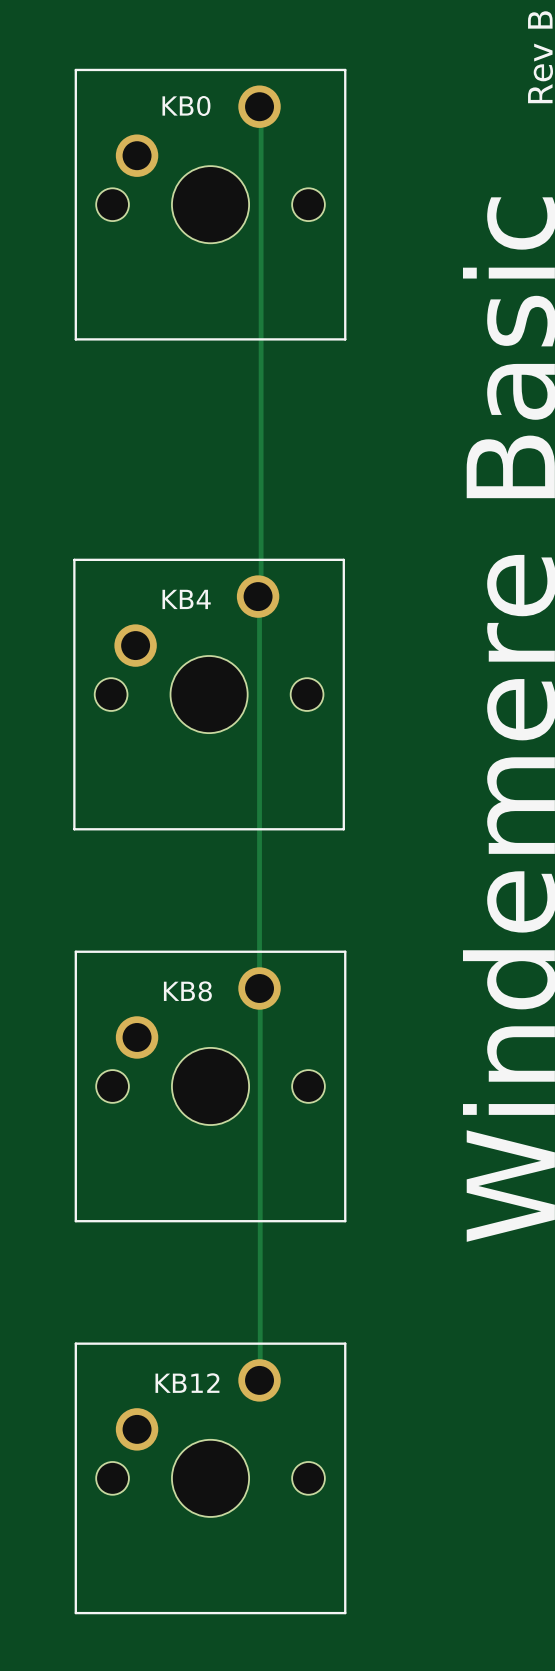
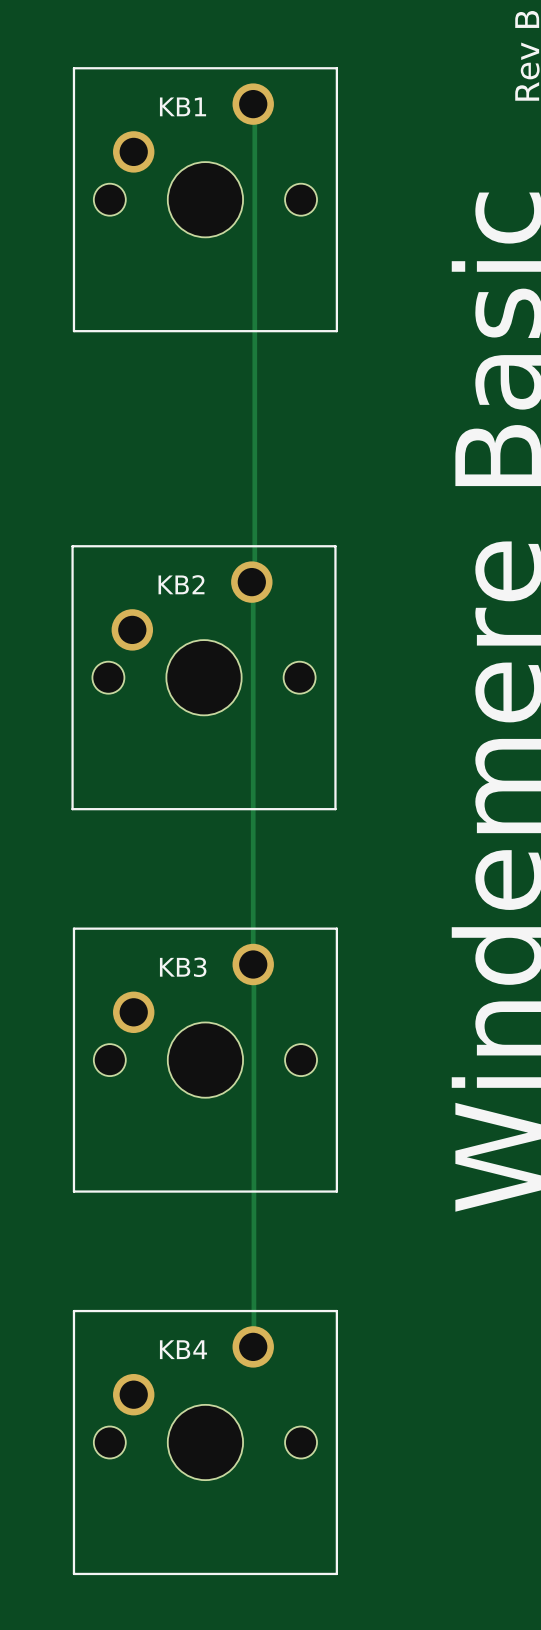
KB0 name: KB0 (186, 105) -> KB1 (183, 106)
KB4 name: KB4 (186, 599) -> KB2 (181, 584)
KB8 name: KB8 (187, 991) -> KB3 (183, 967)
KB12 name: KB12 (187, 1383) -> KB4 (183, 1349)

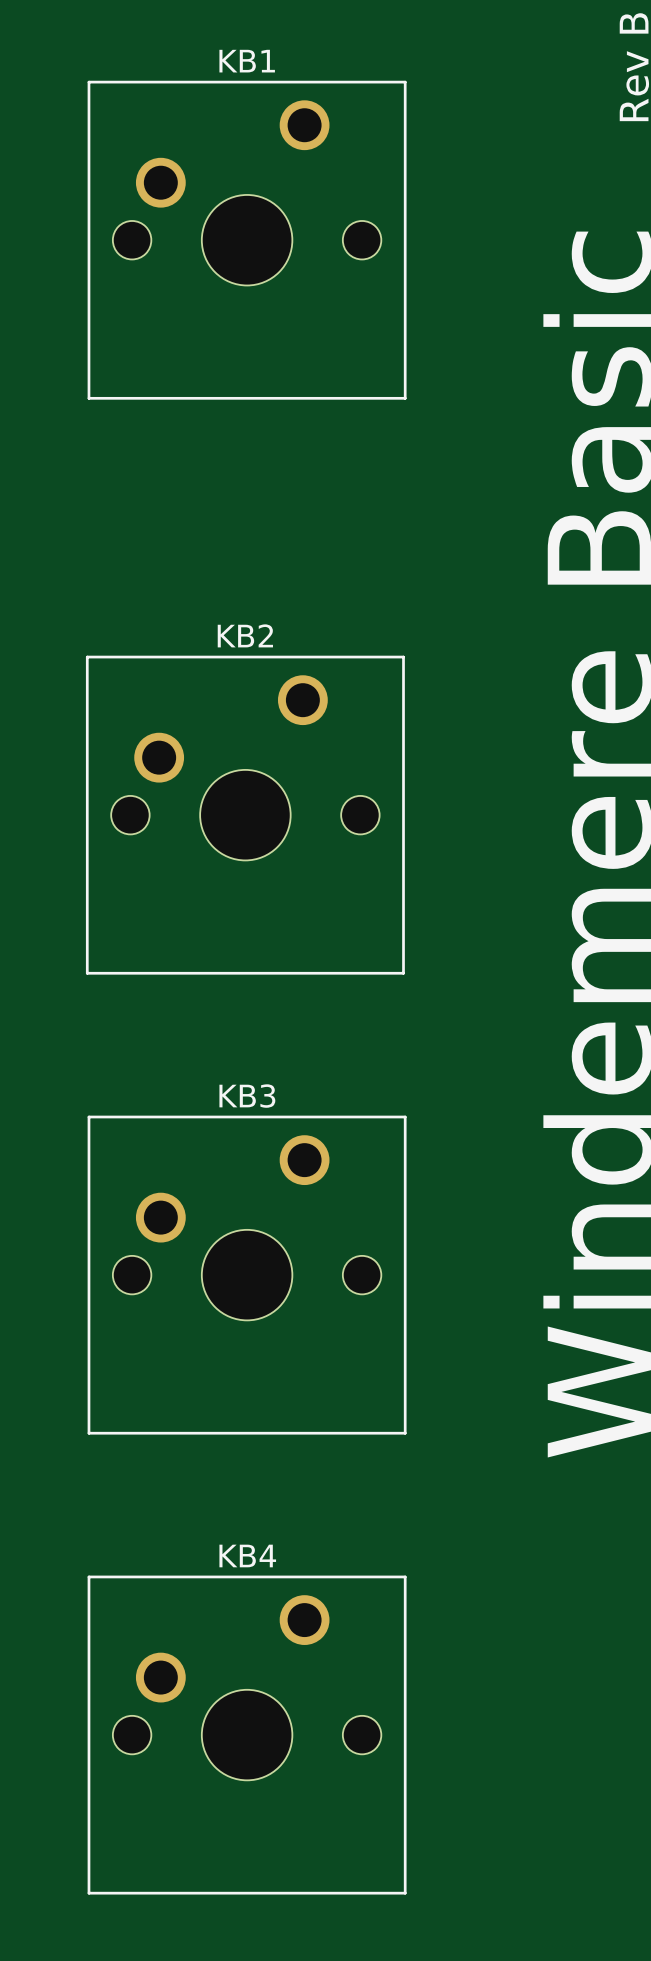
track: (253, 104) (254, 105) (254, 579) (251, 582) (253, 1346) -> none
KB1 name position: KB1 (183, 106) -> KB1 (247, 61)
KB2 name position: KB2 (181, 584) -> KB2 (245, 635)
KB3 name position: KB3 (183, 967) -> KB3 (247, 1096)
KB4 name position: KB4 (183, 1349) -> KB4 (247, 1555)

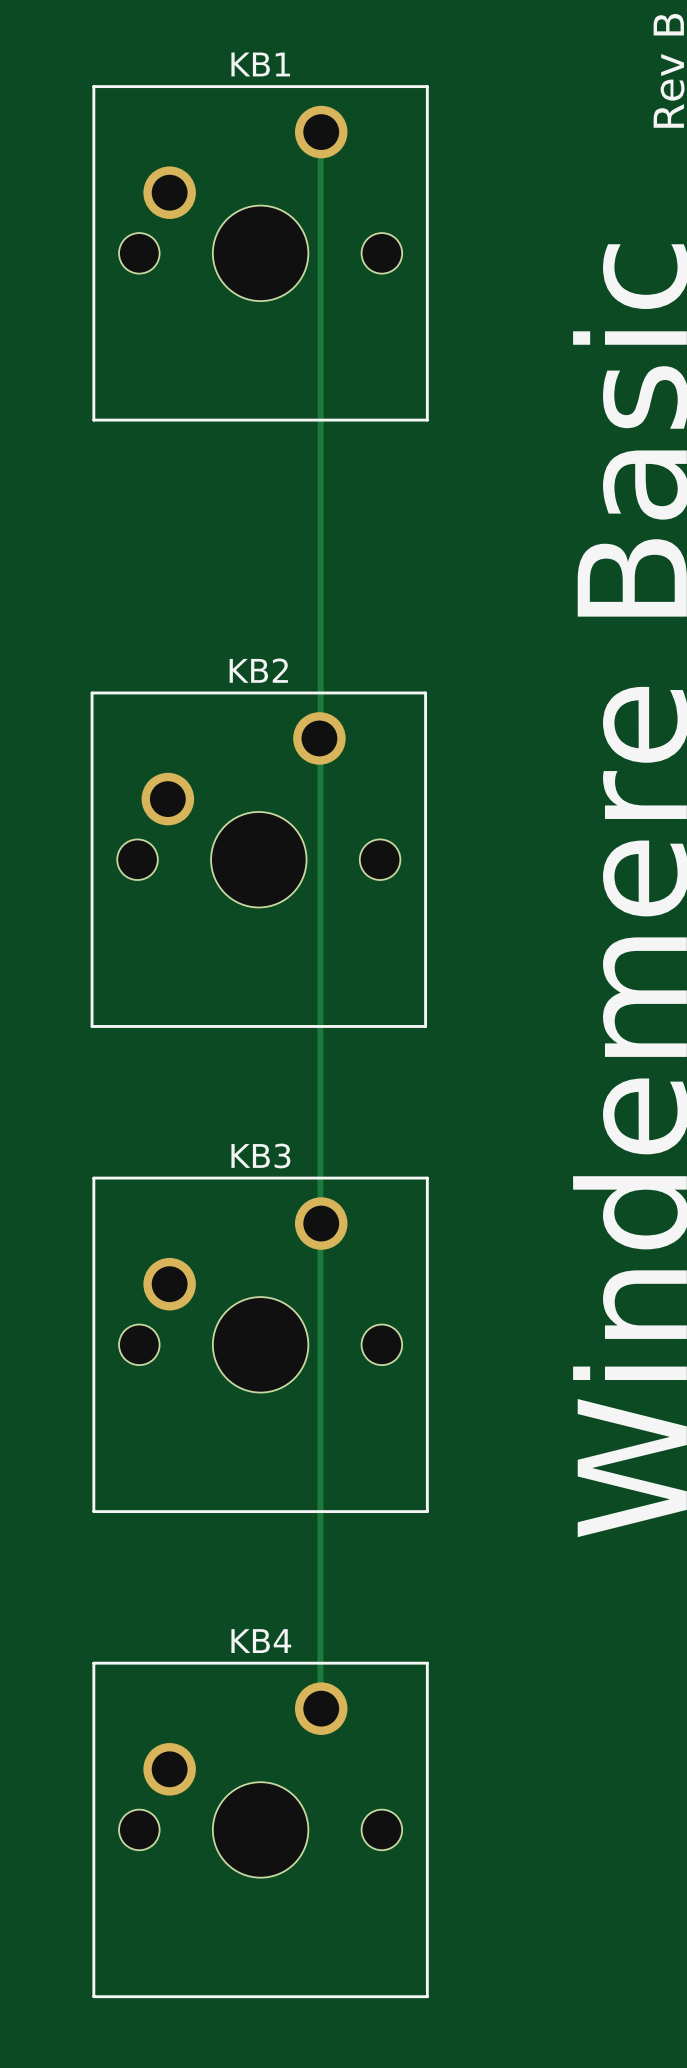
track: none -> (319, 127) (319, 1704)

